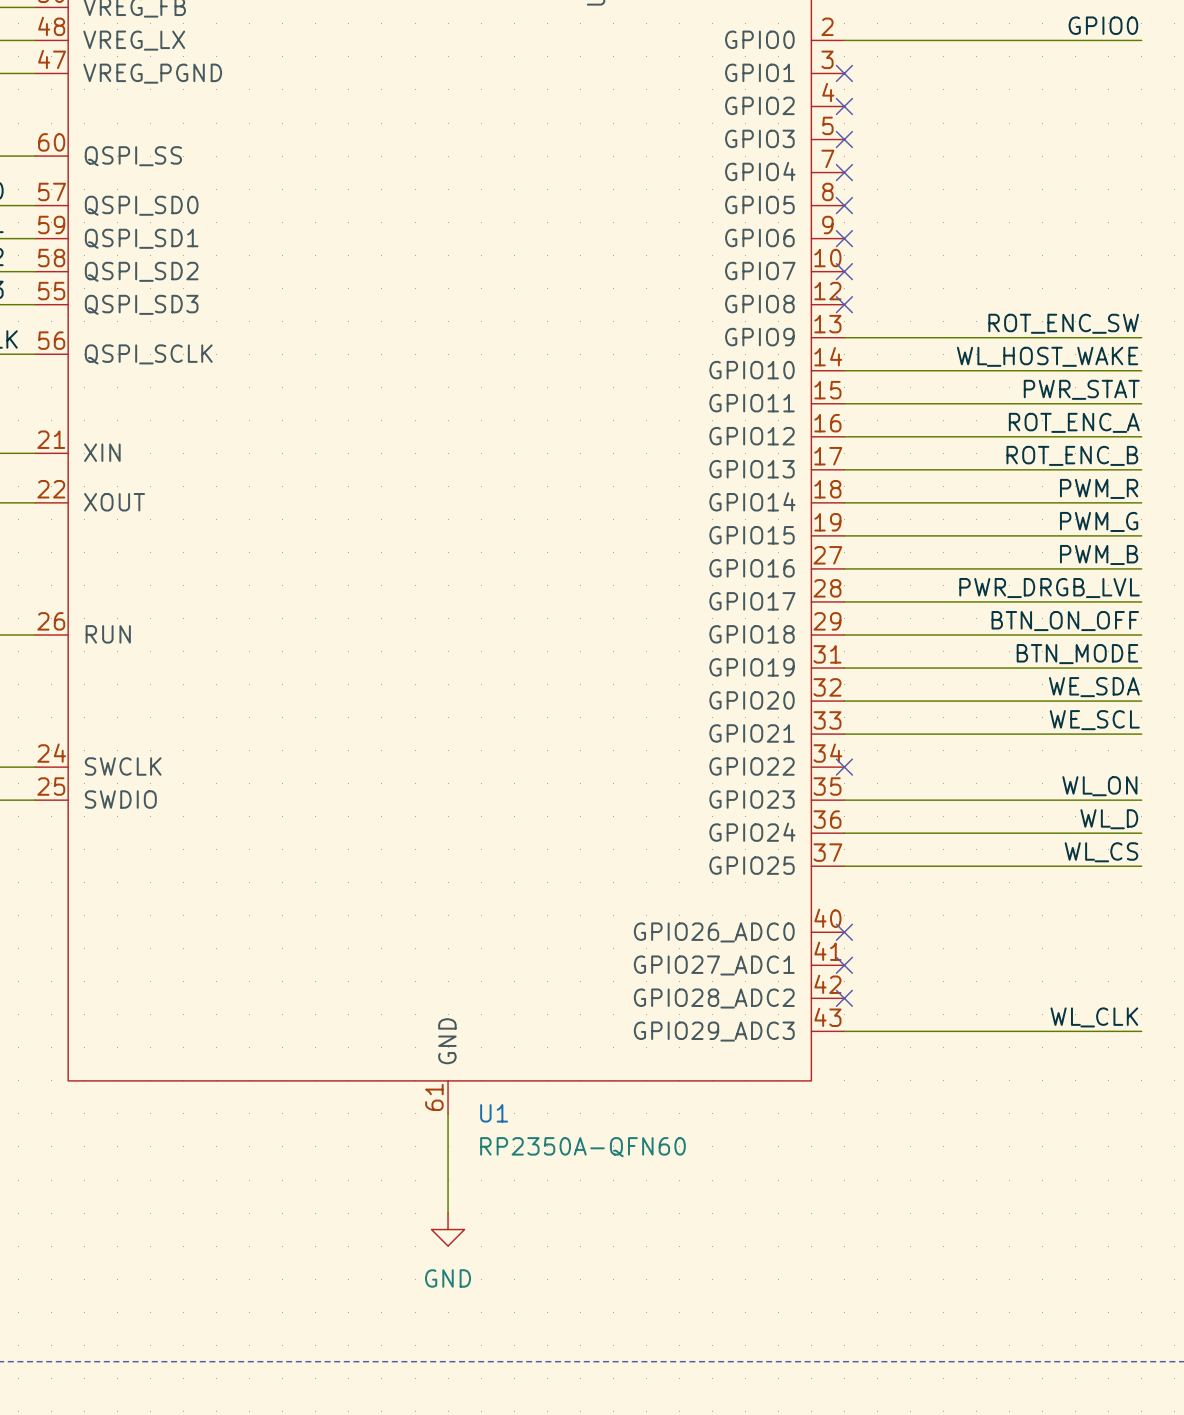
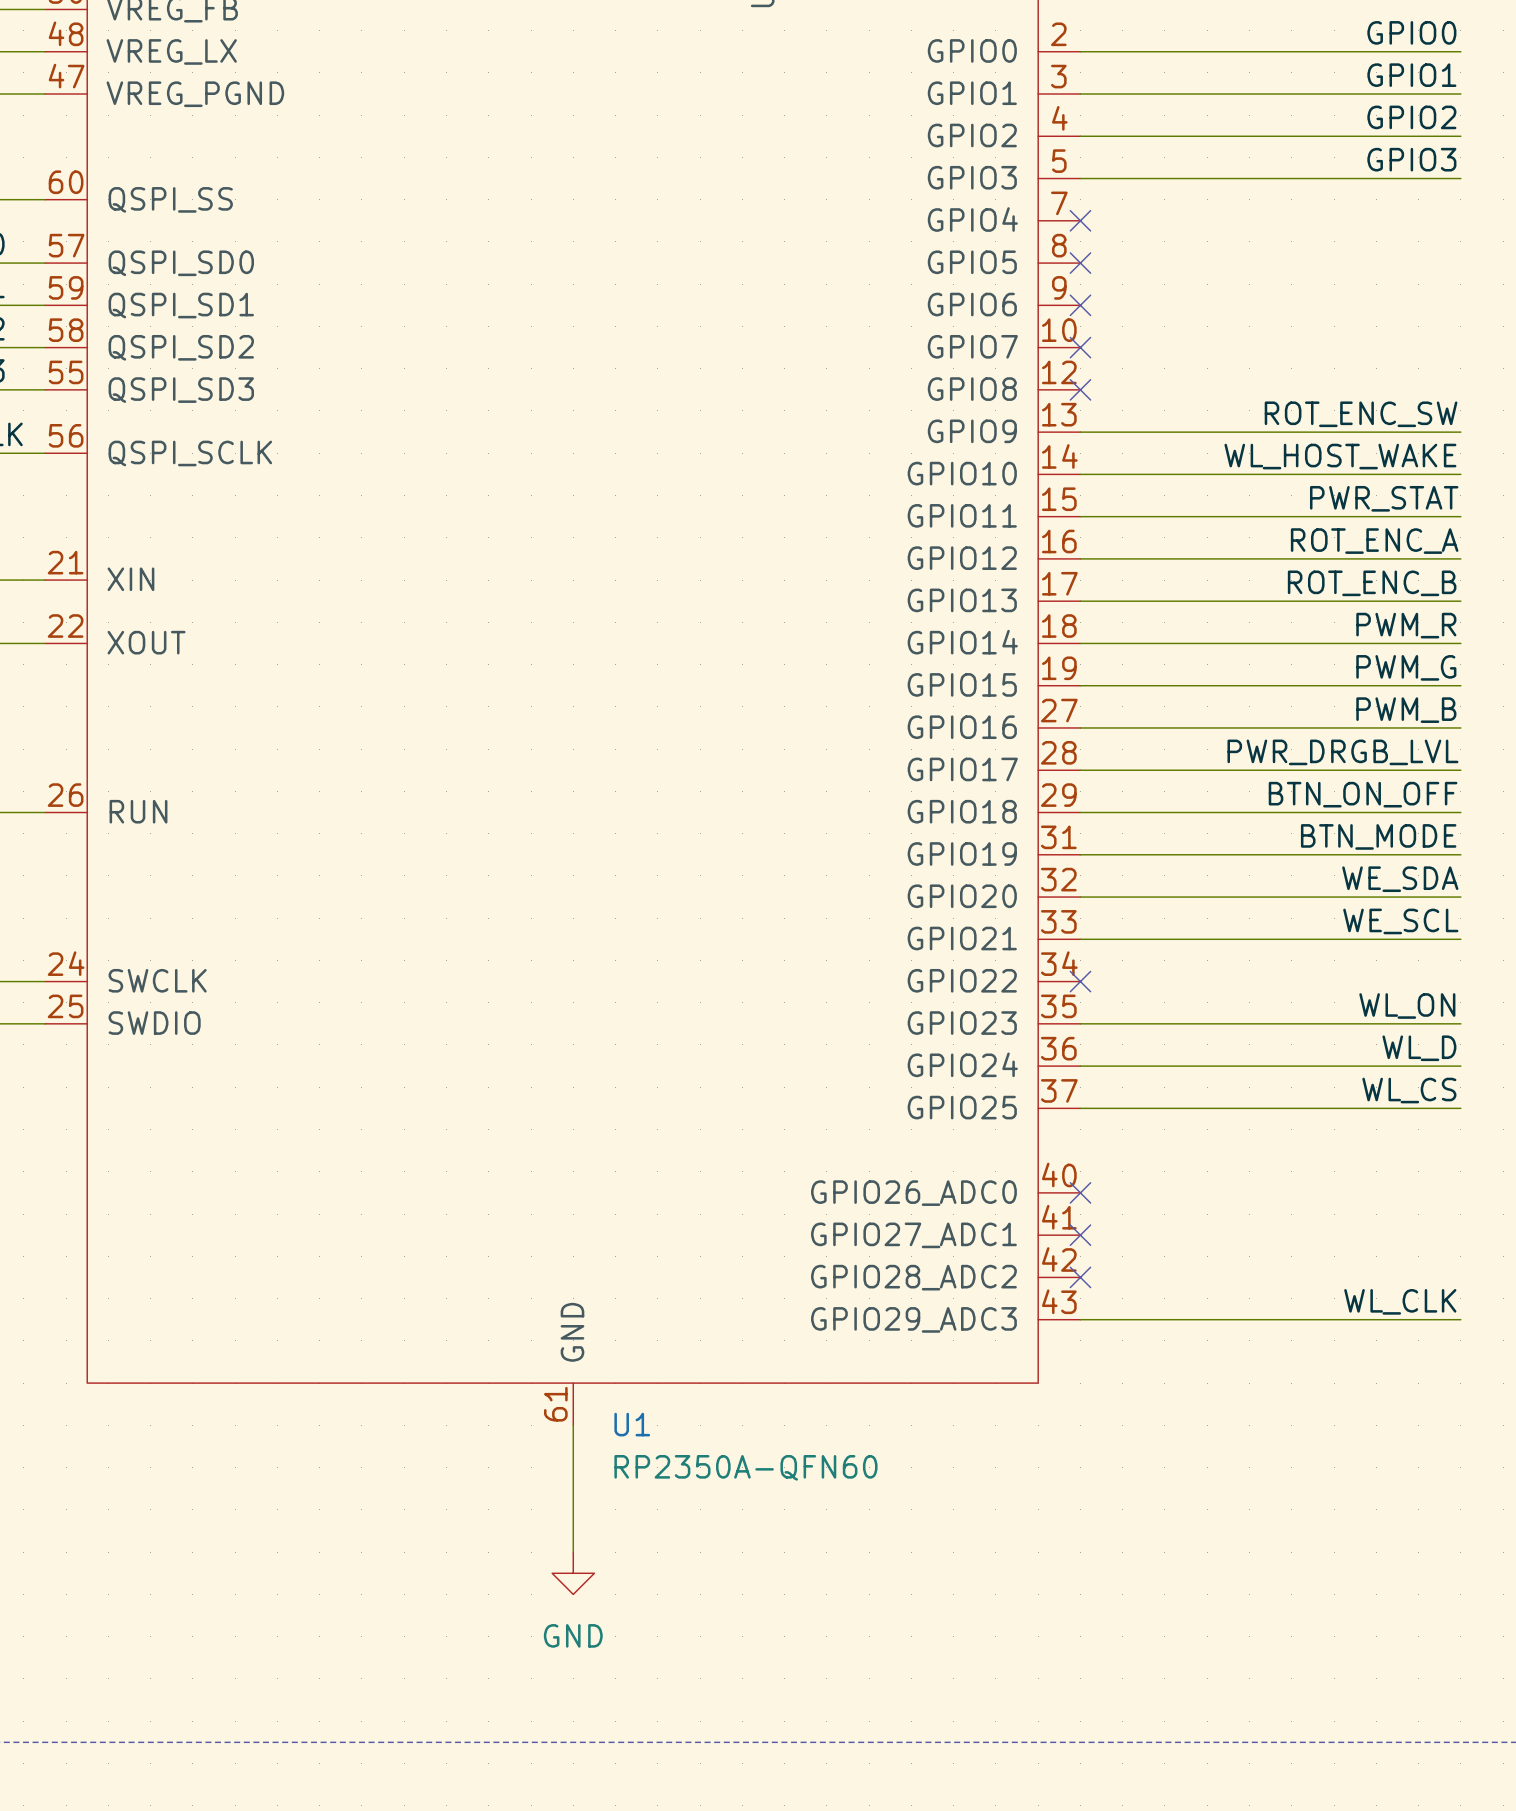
label: none -> GPIO1 (1411, 75)
wire: none -> (1080, 94) (1460, 94)
no-connect mark: (844, 73) -> none
label: none -> GPIO2 (1411, 117)
wire: none -> (1080, 136) (1460, 136)
no-connect mark: (844, 106) -> none
label: none -> GPIO3 (1411, 159)
wire: none -> (1080, 178) (1460, 178)
no-connect mark: (844, 139) -> none

